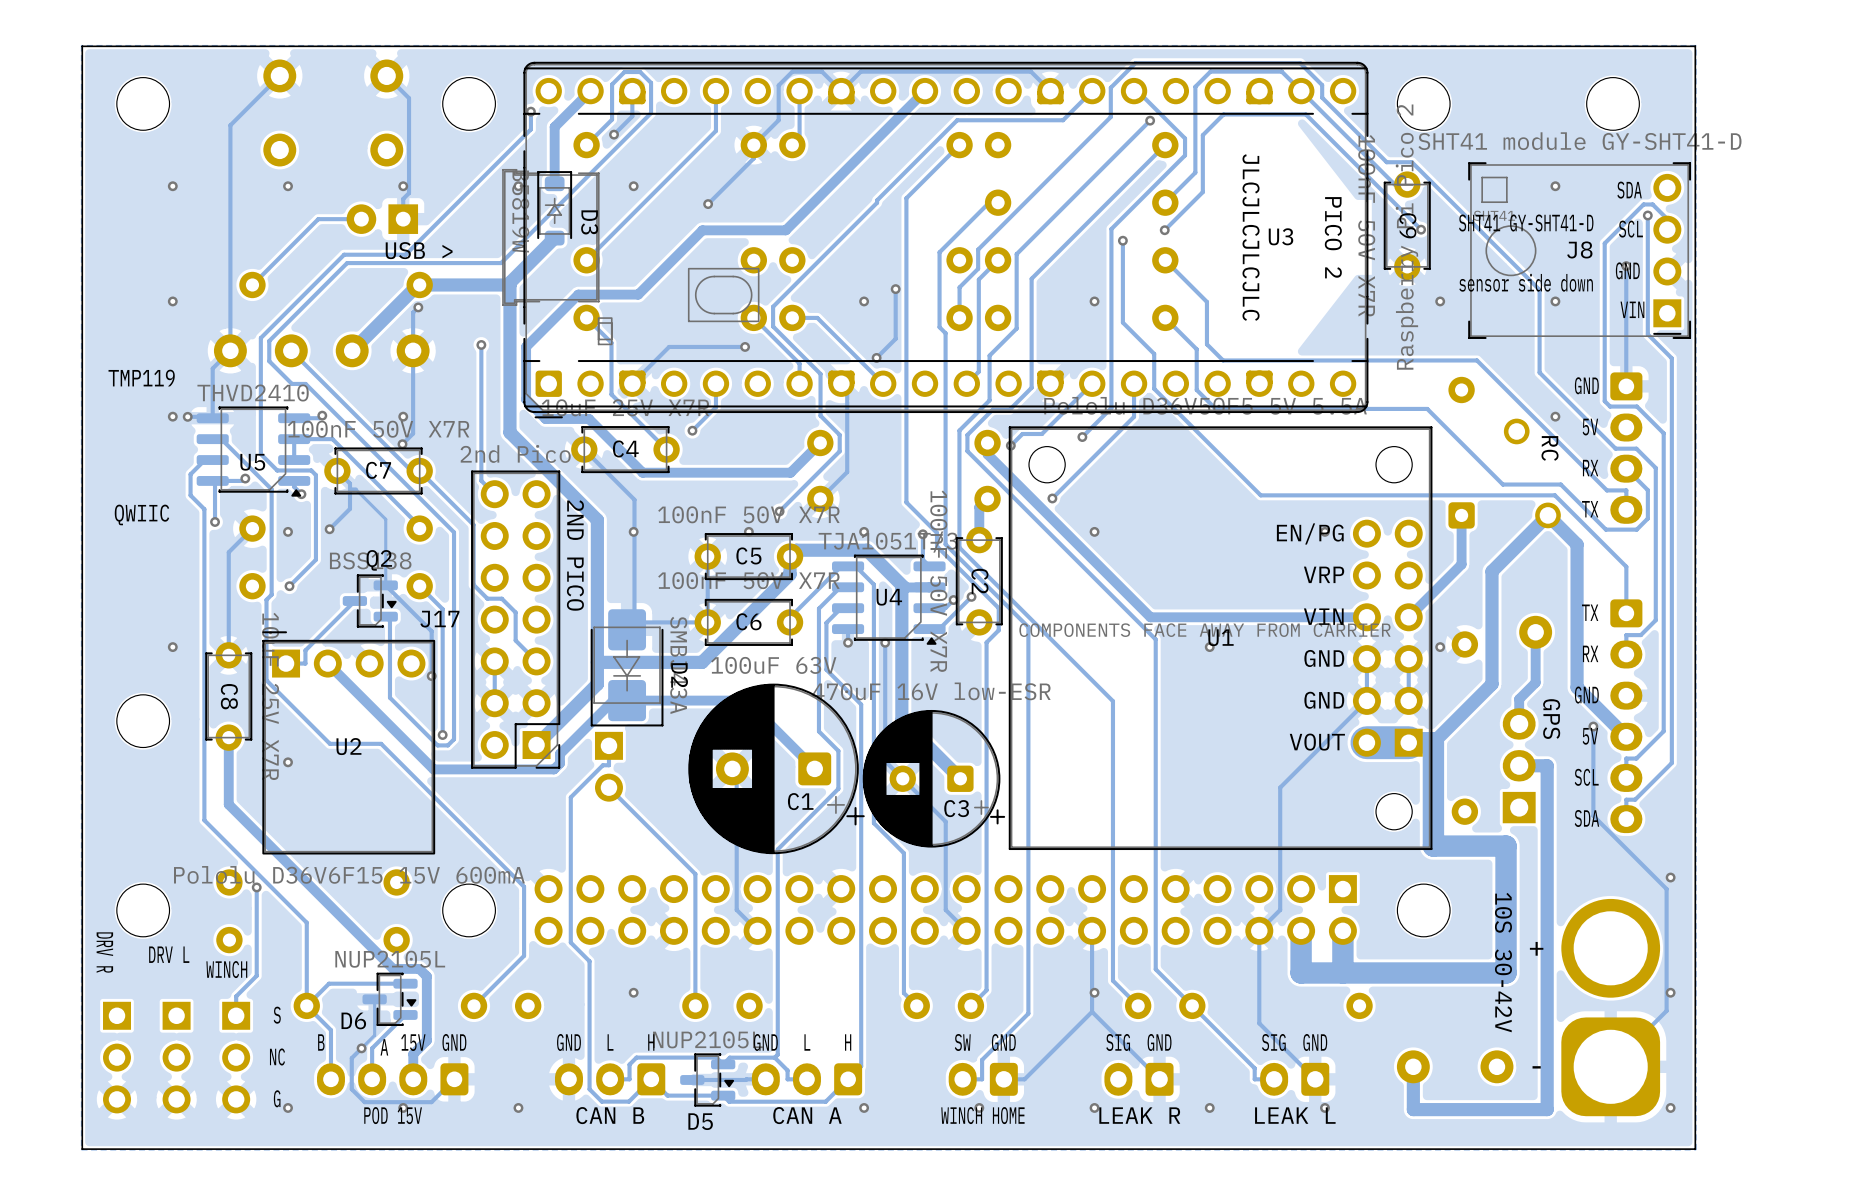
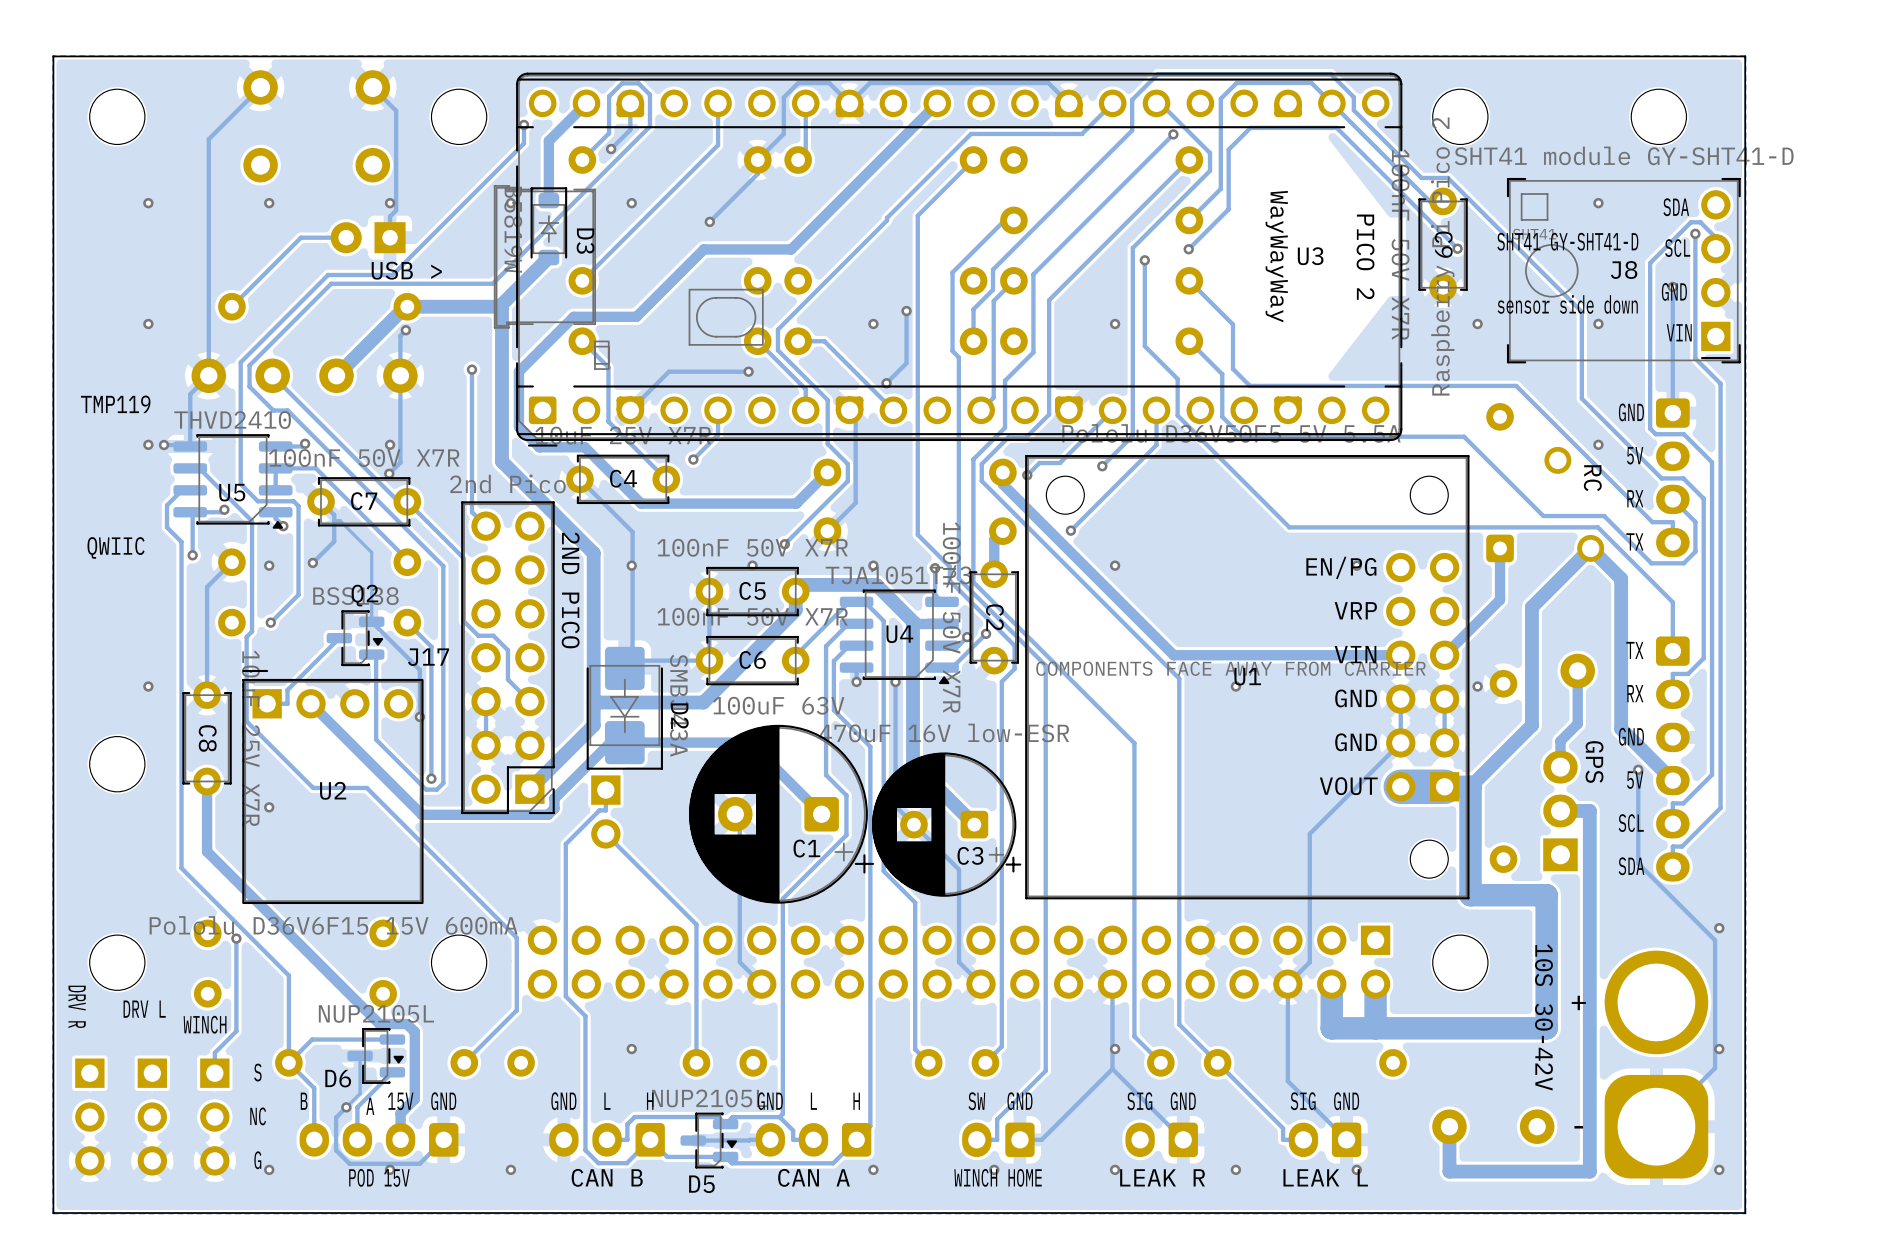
text: JLCJLCJLCJLC (1251, 237) -> WayWayWay (1276, 256)

